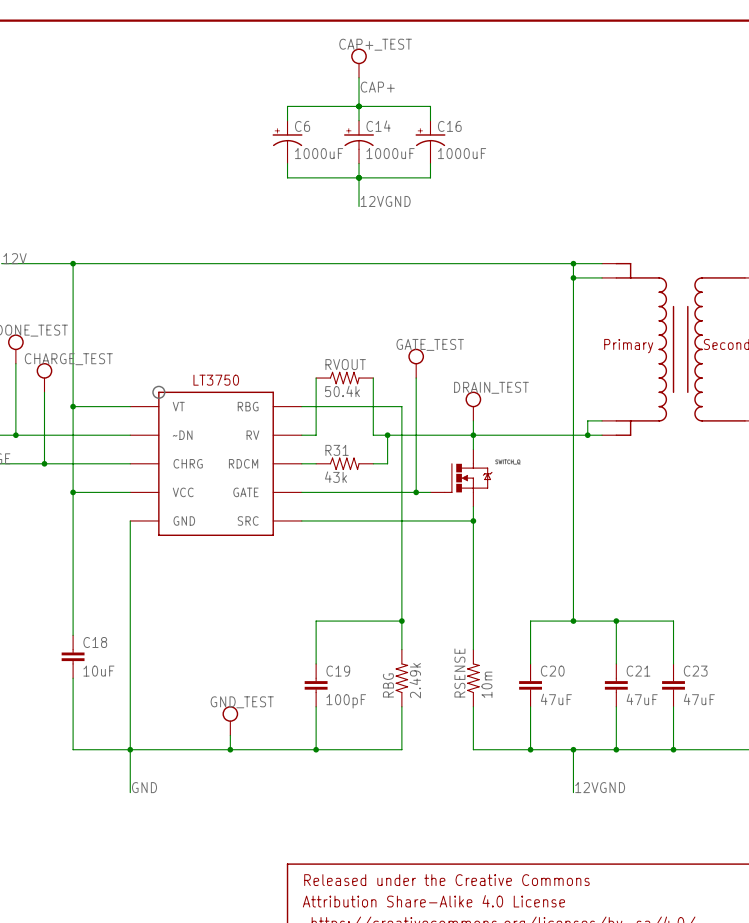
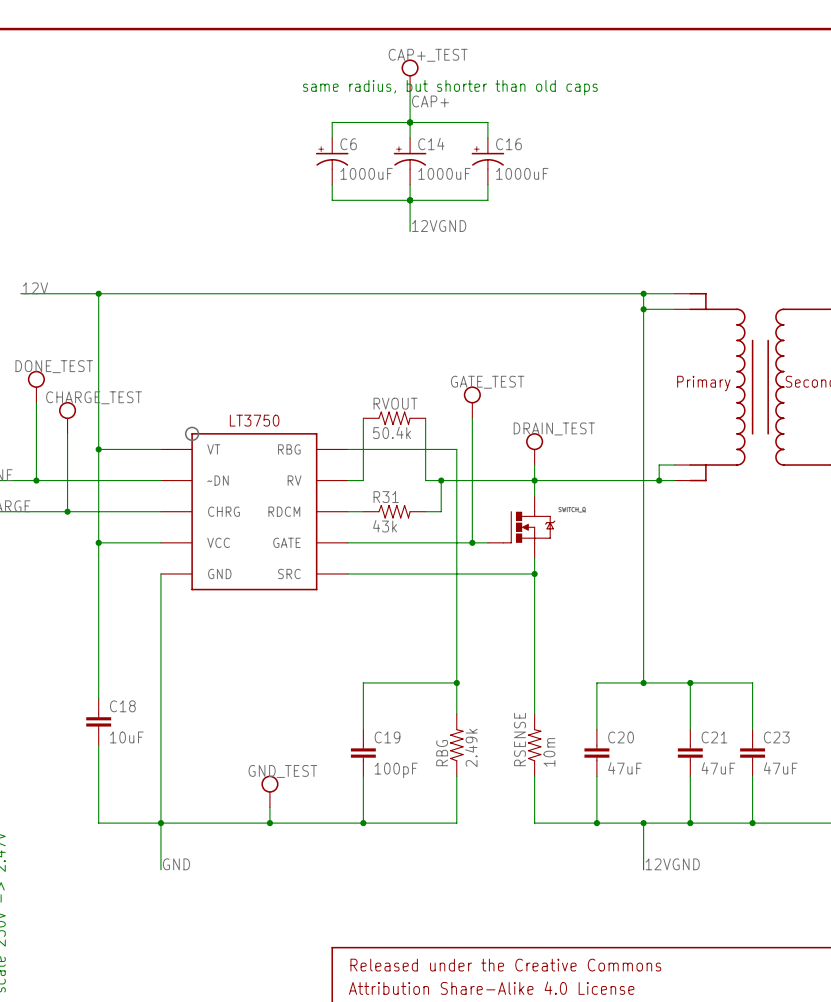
text: none -> same radius, but shorter than old caps (450, 87)

